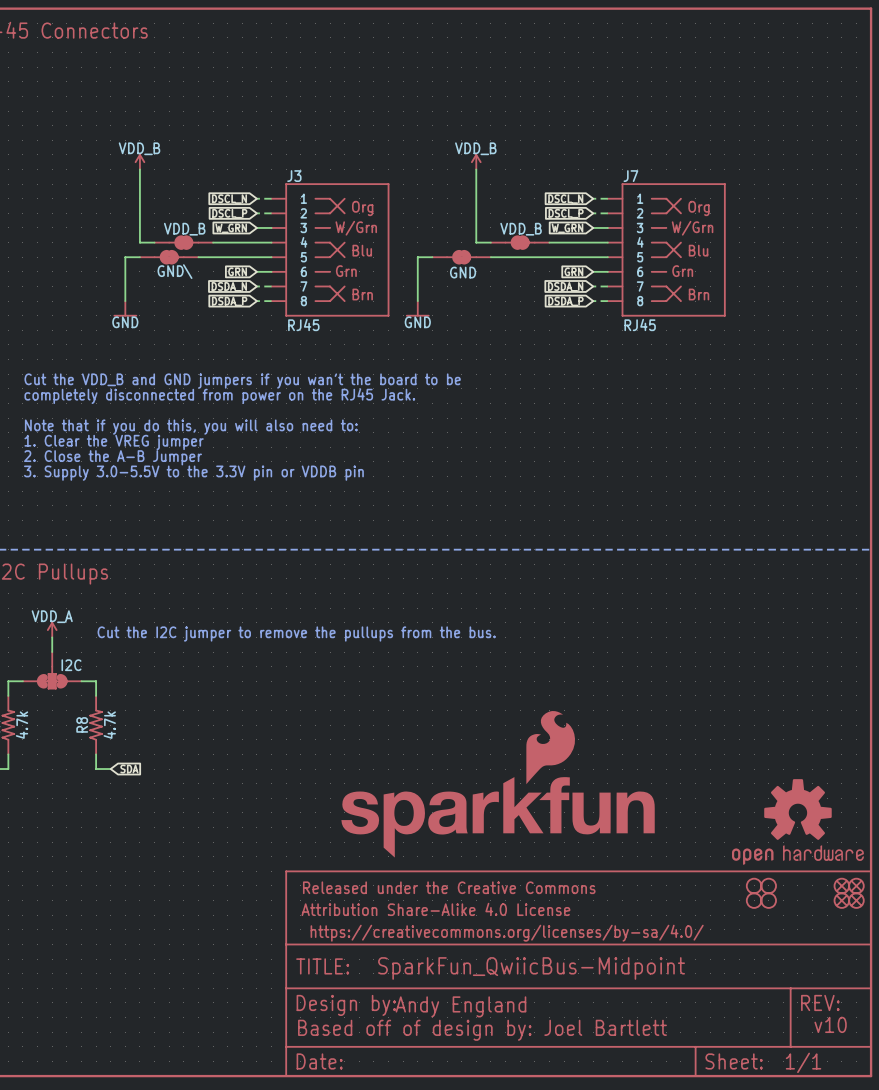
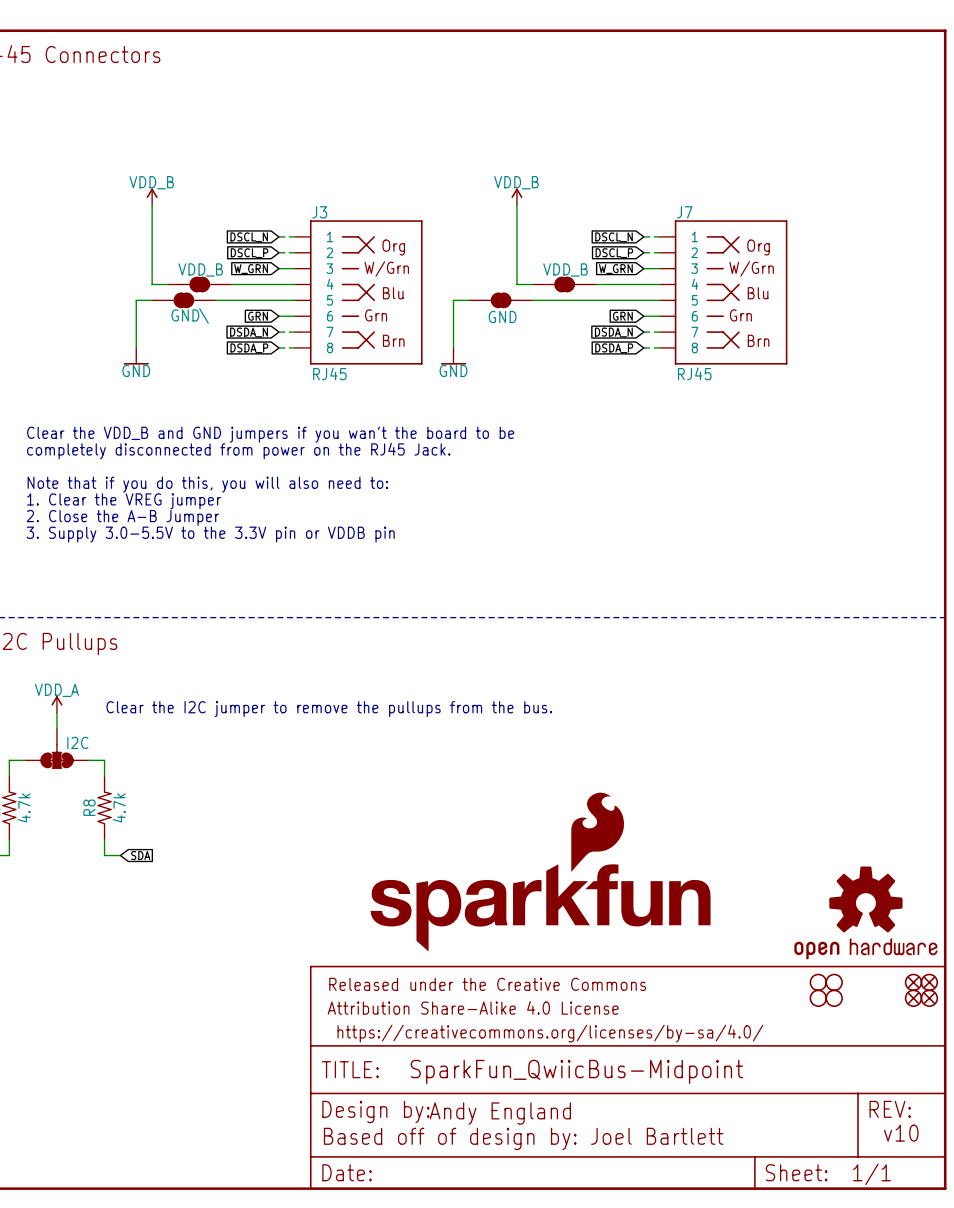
text: Cut the VDD_B and GND jumpers if you wan't the board to be (242, 381) -> Clear the VDD_B and GND jumpers if you wan't the board to be (270, 434)
text: Cut the I2C jumper to remove the pullups from the bus. (296, 634) -> Clear the I2C jumper to remove the pullups from the bus. (329, 709)

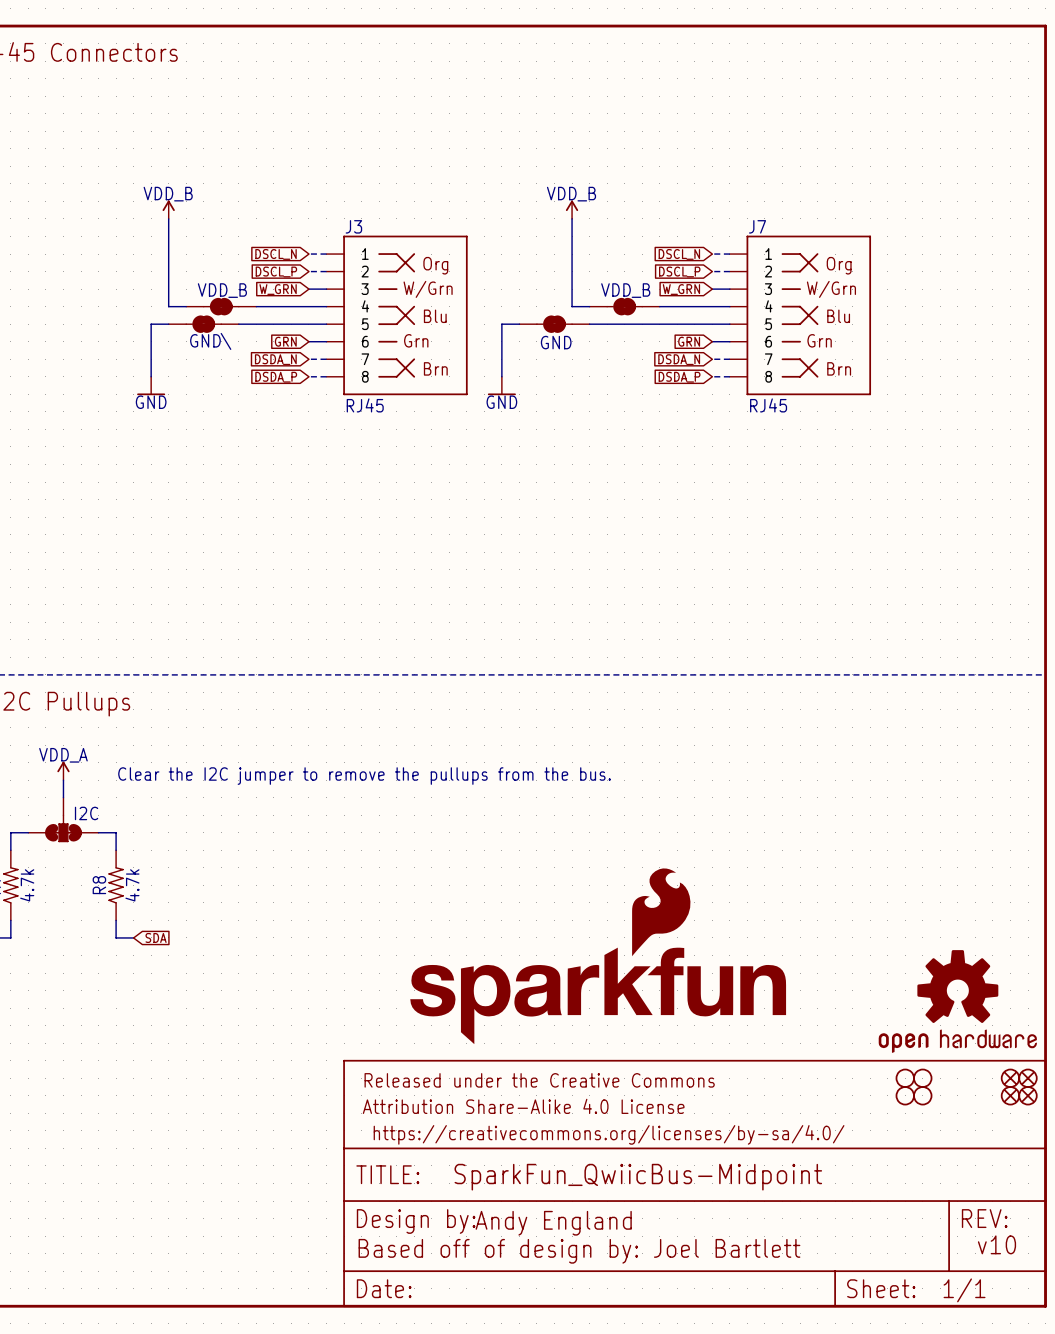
text: Clear the VDD_B and GND jumpers if you wan't the board to be (270, 434) -> none
text: completely disconnected from power on the RJ45 Jack. (238, 451) -> none
text: Note that if you do this, you will also need to: (207, 484) -> none
text: 1. Clear the VREG jumper (124, 501) -> none
text: 2. Close the A-B Jumper (122, 517) -> none
text: 3. Supply 3.0-5.5V to the 3.3V pin or VDDB pin (210, 534) -> none

